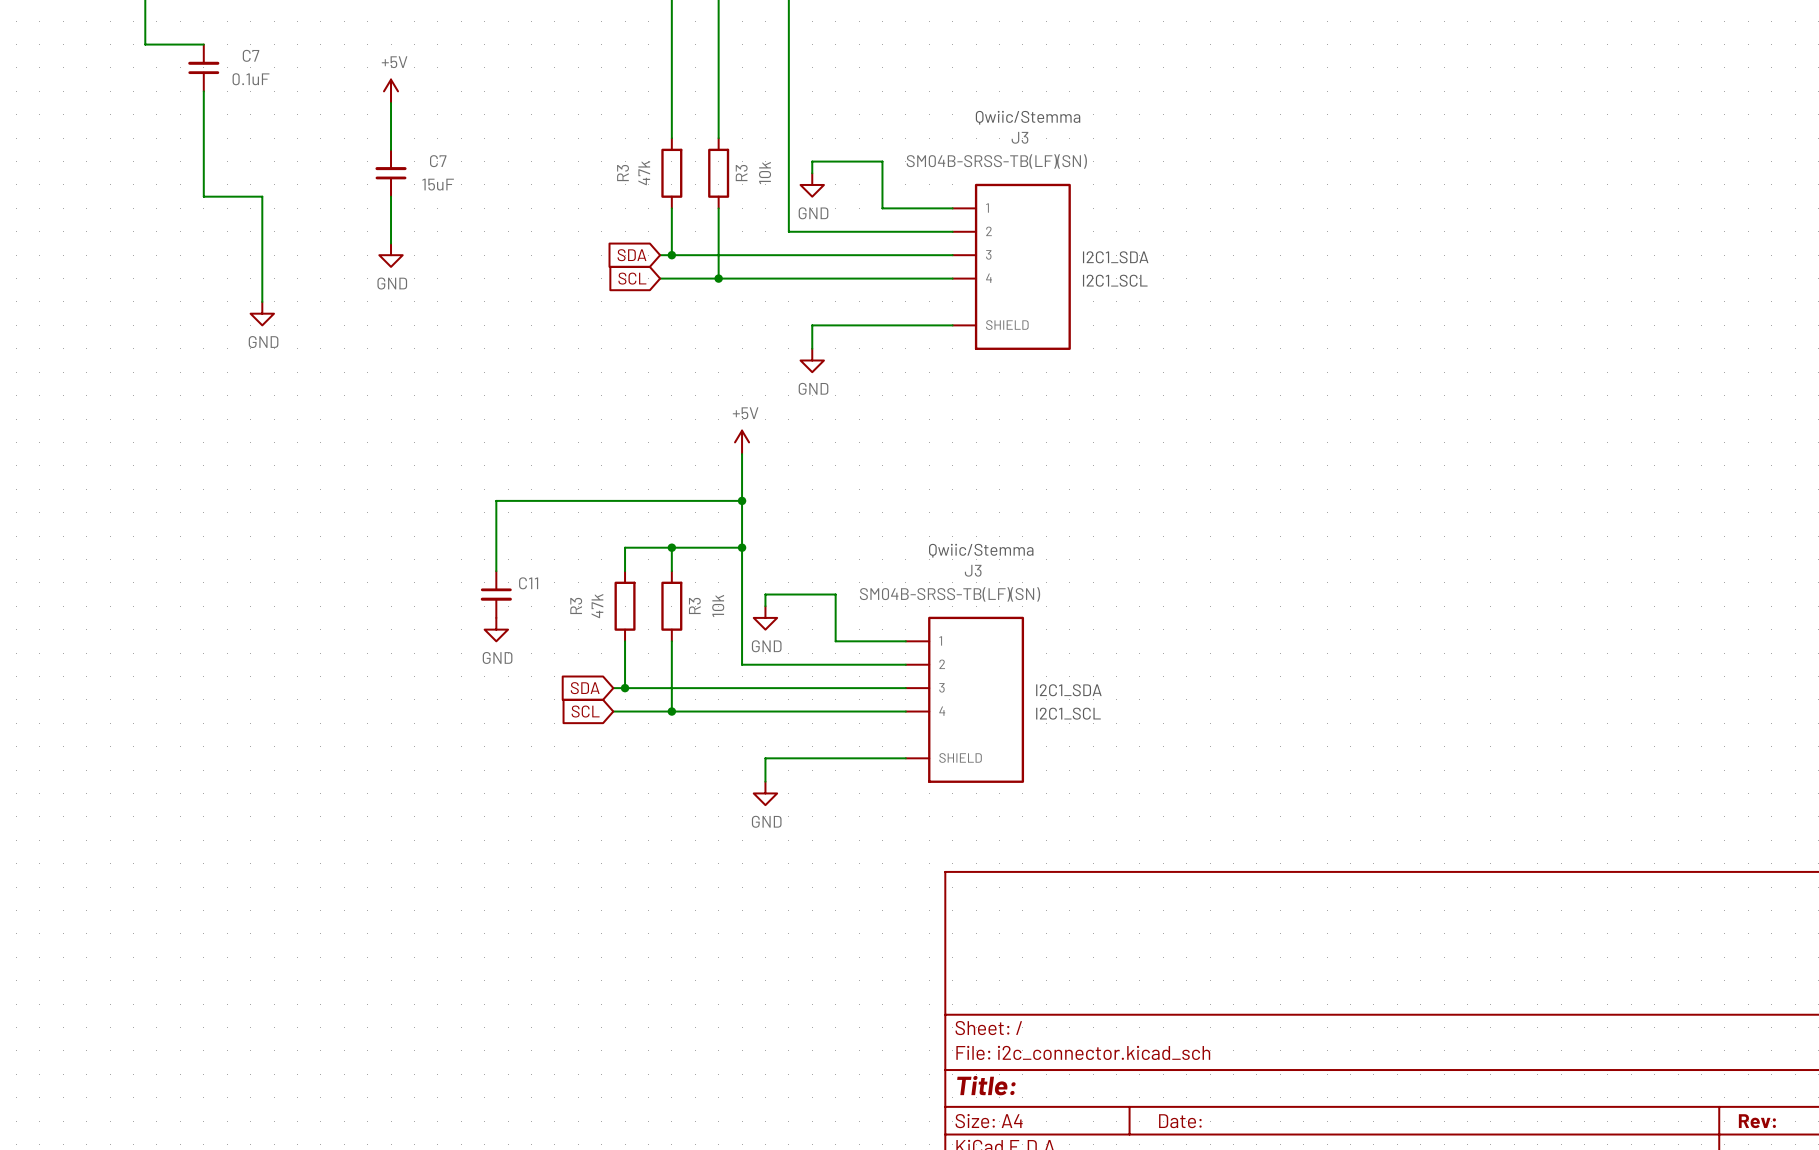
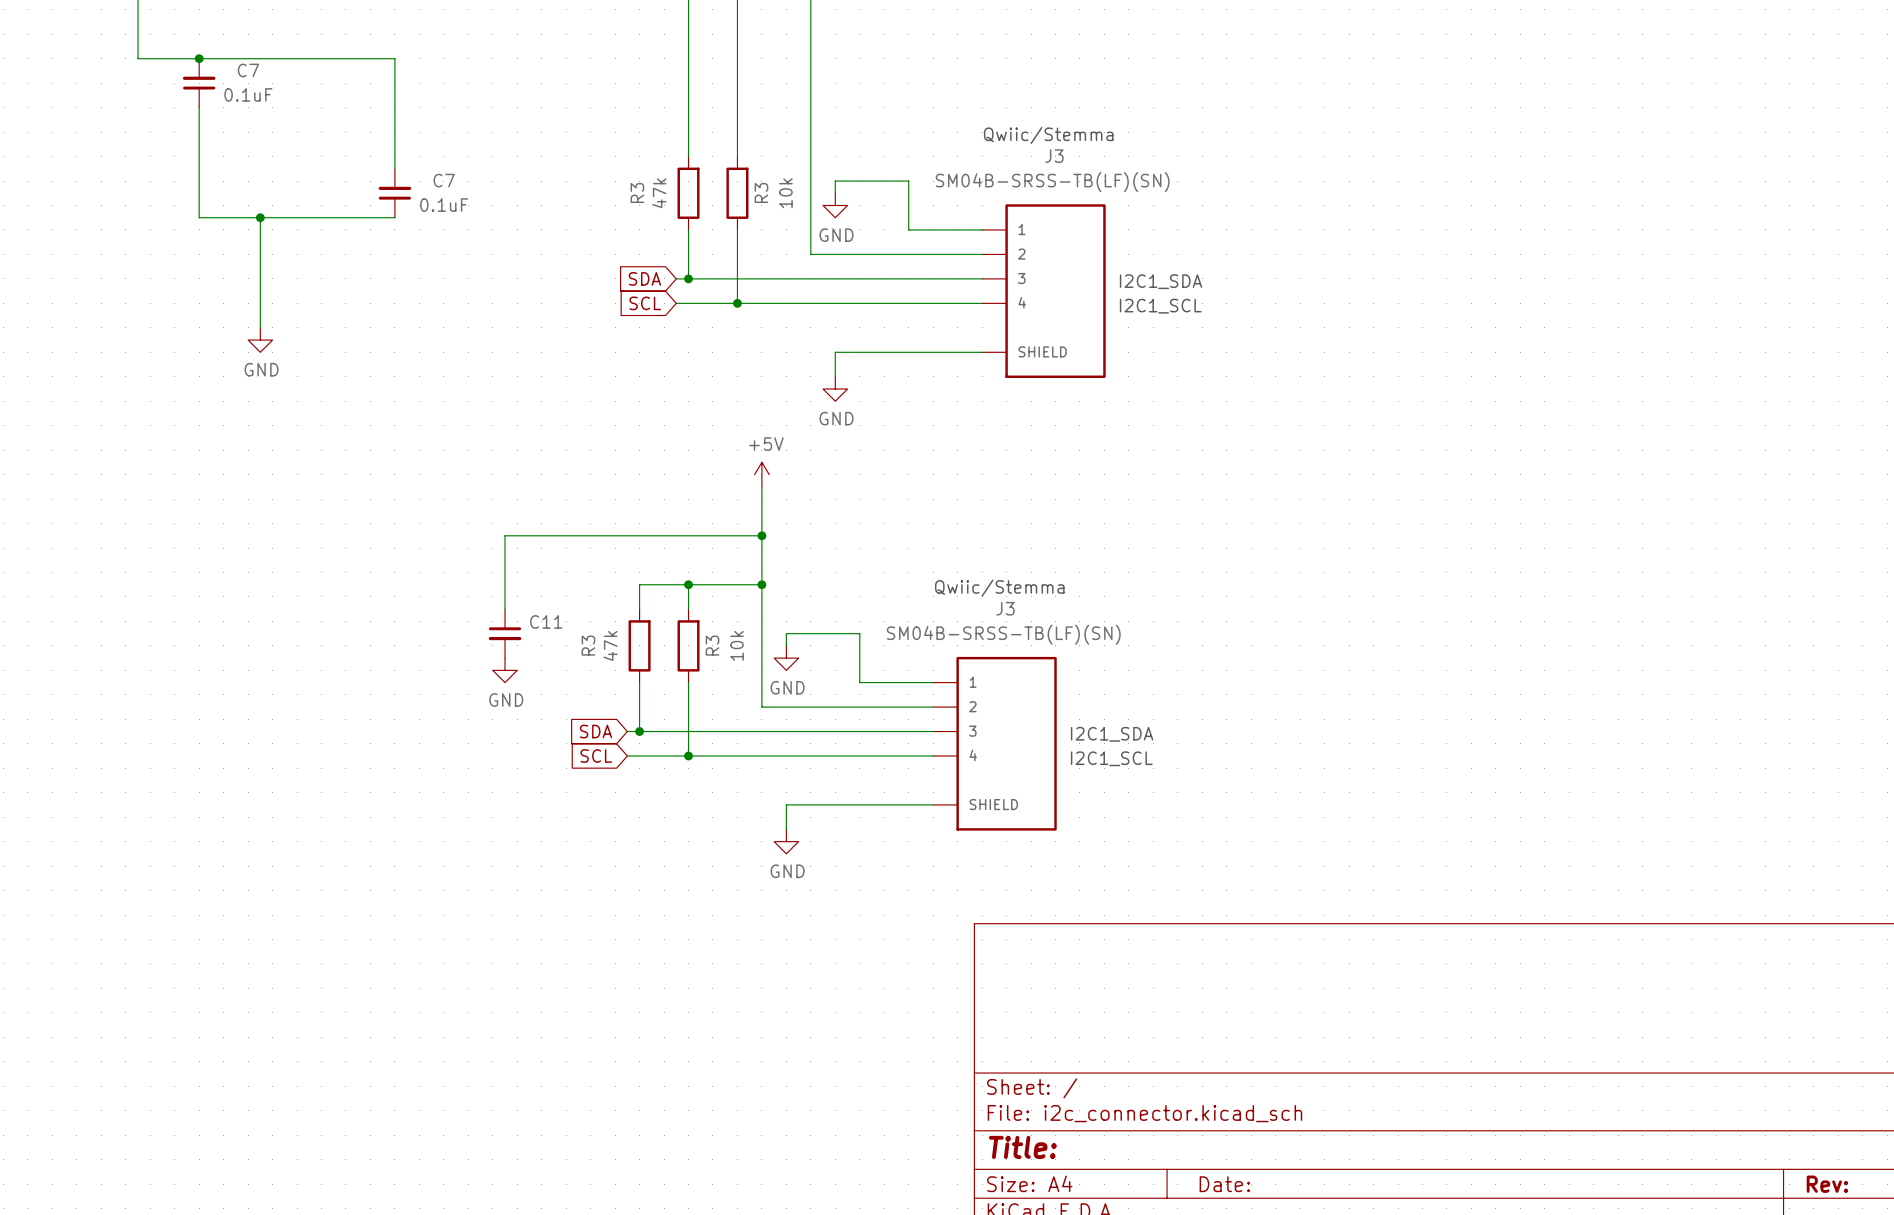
wire: none -> (199, 58) (394, 58) (394, 119)
junction: none -> (199, 58)
power symbol: +5V (391, 91) -> none
C7 value: 15uF (438, 184) -> 0.1uF (444, 205)
junction: none -> (260, 217)
wire: (391, 196) (391, 243) -> (394, 217) (260, 217)
power symbol: GND (391, 255) -> none

